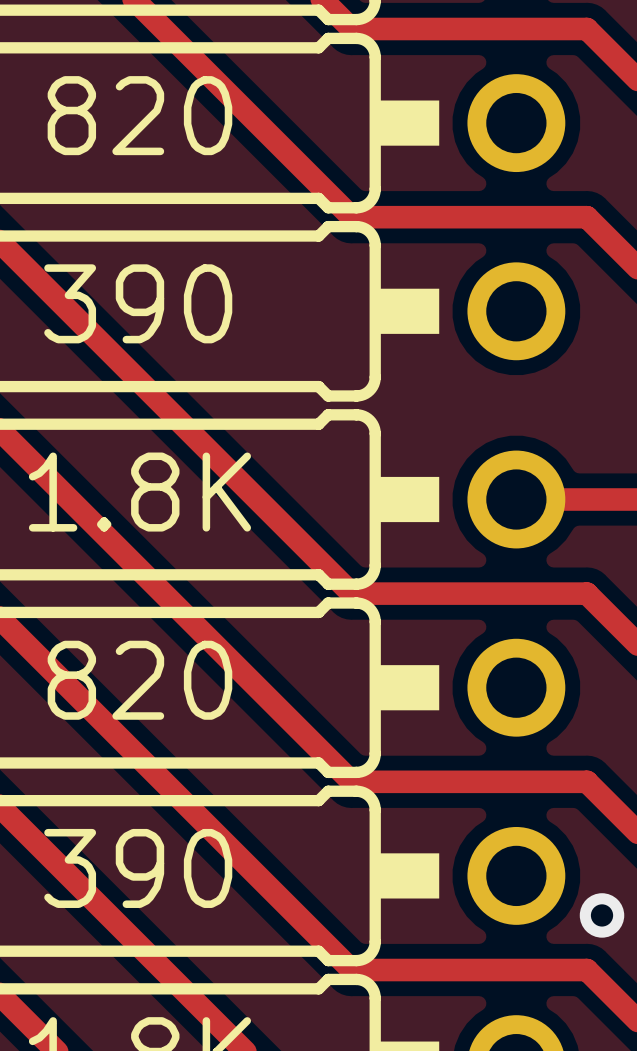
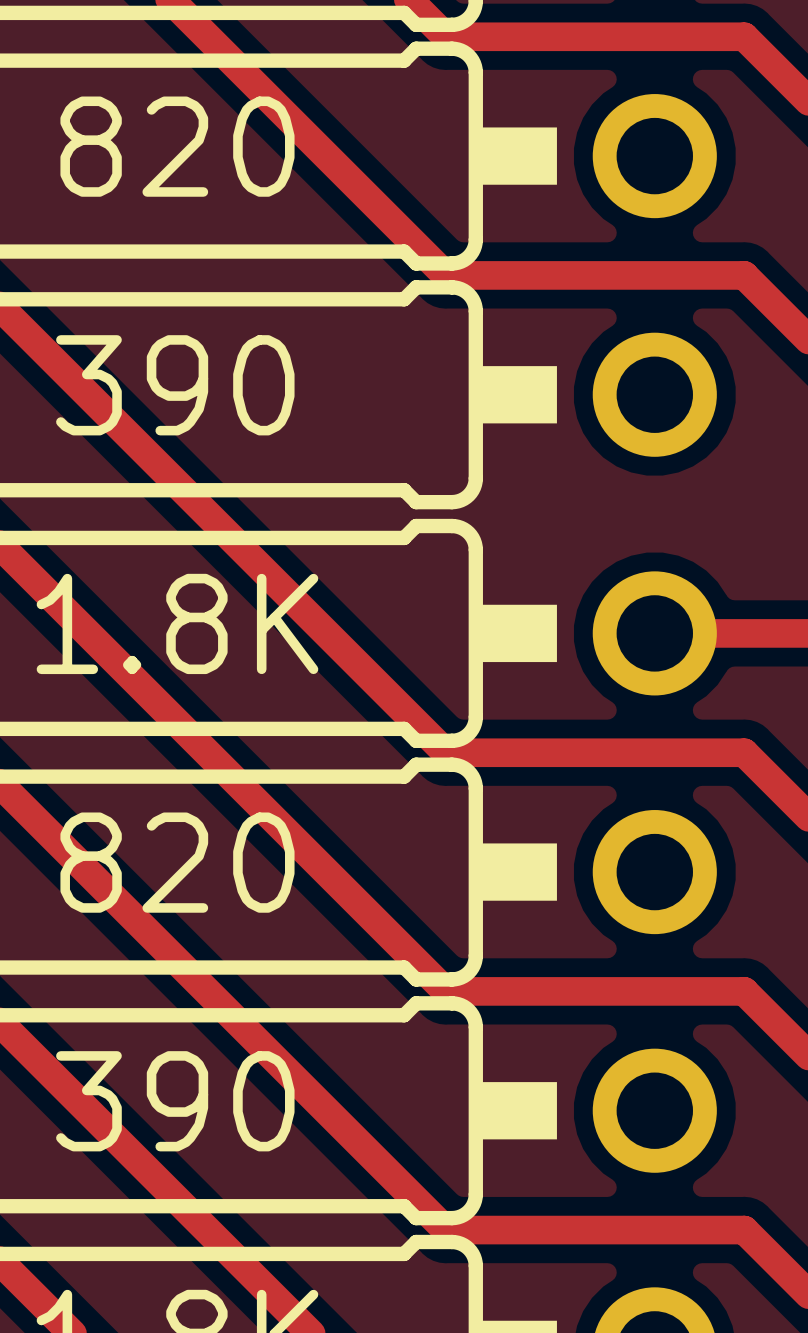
via: (602, 915) -> none

